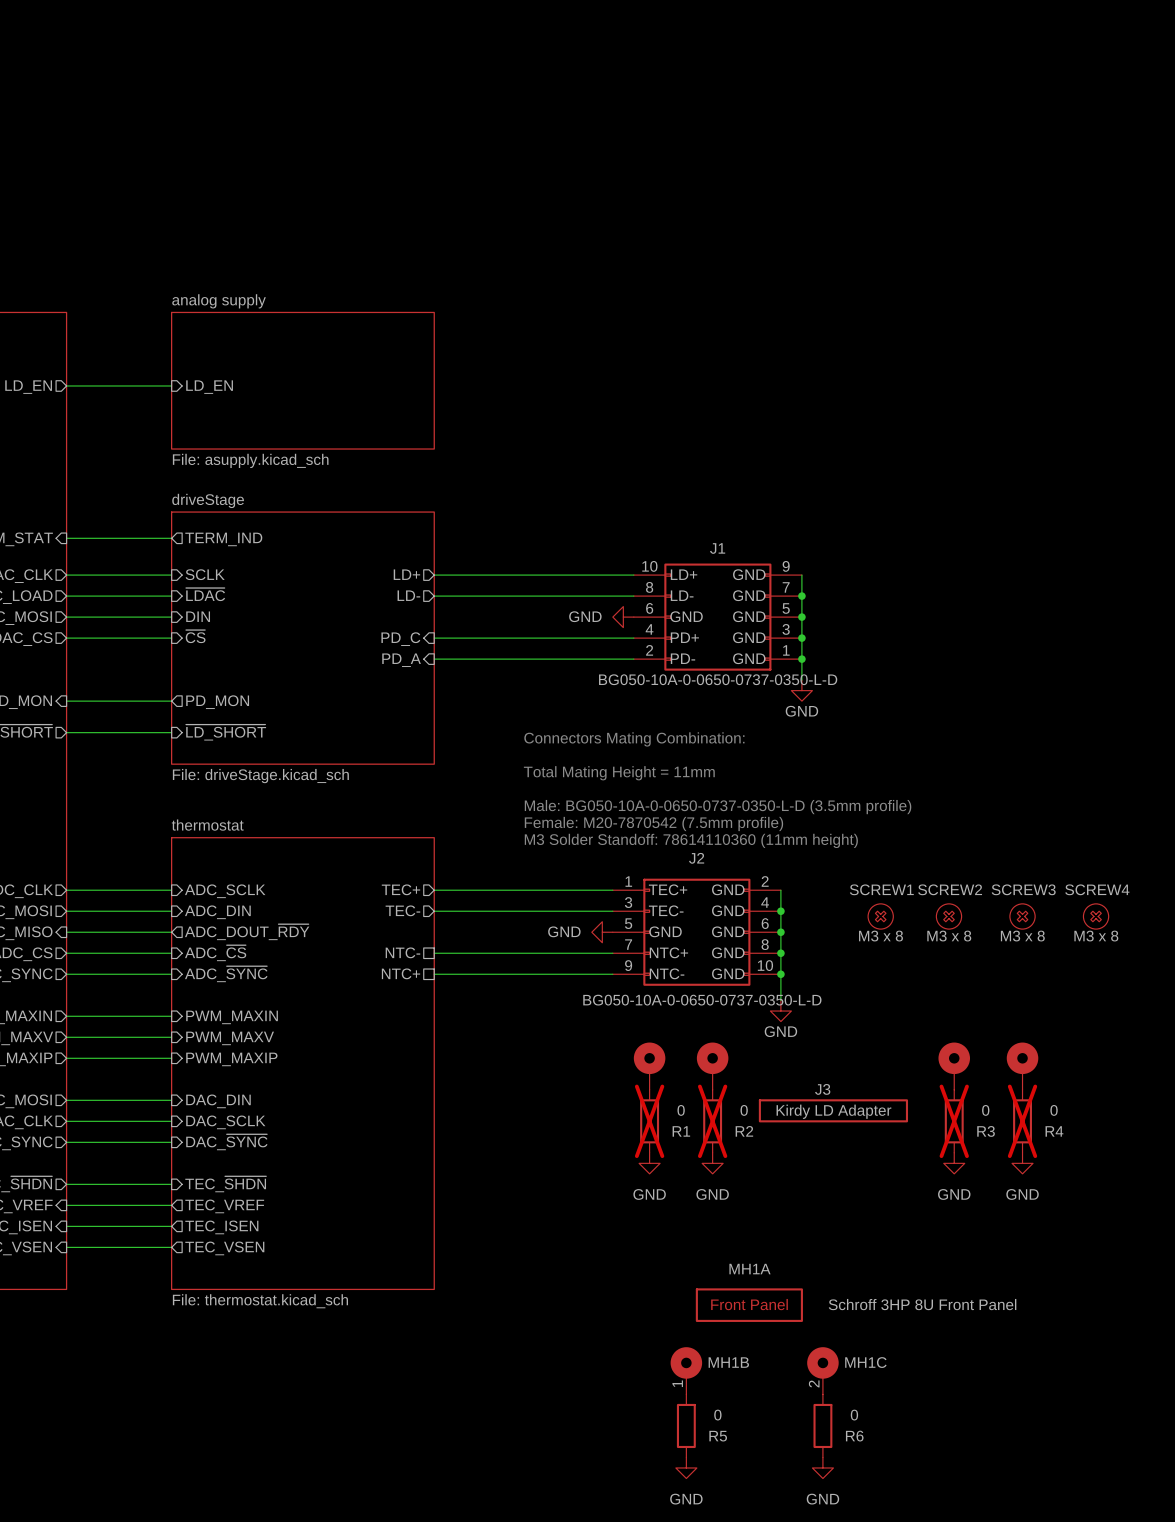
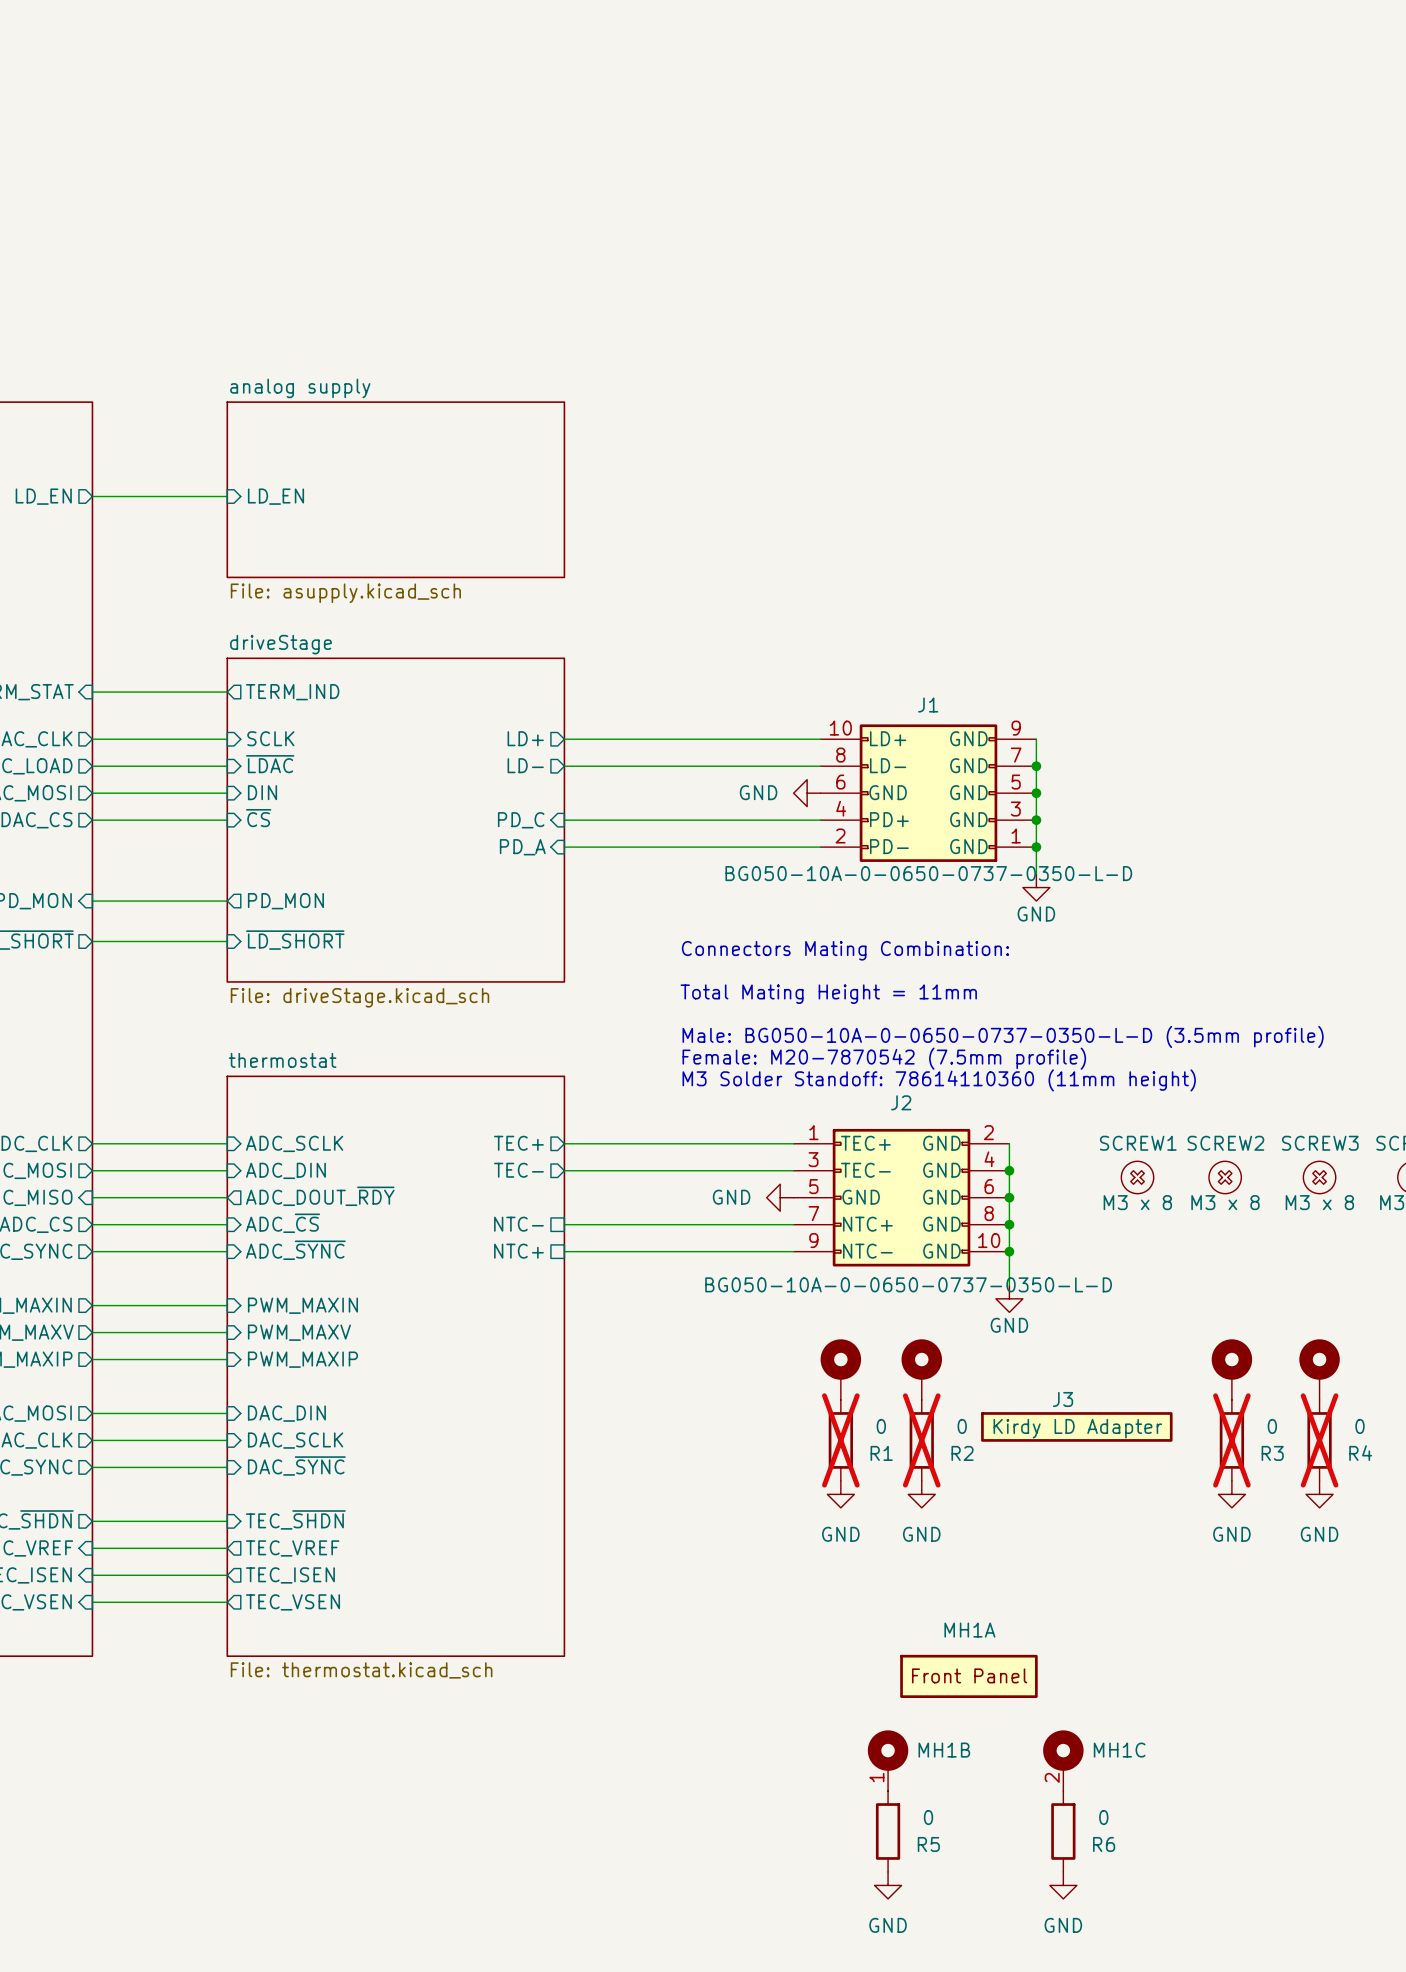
MH1A value: Schroff 3HP 8U Front Panel (922, 1304) -> none

